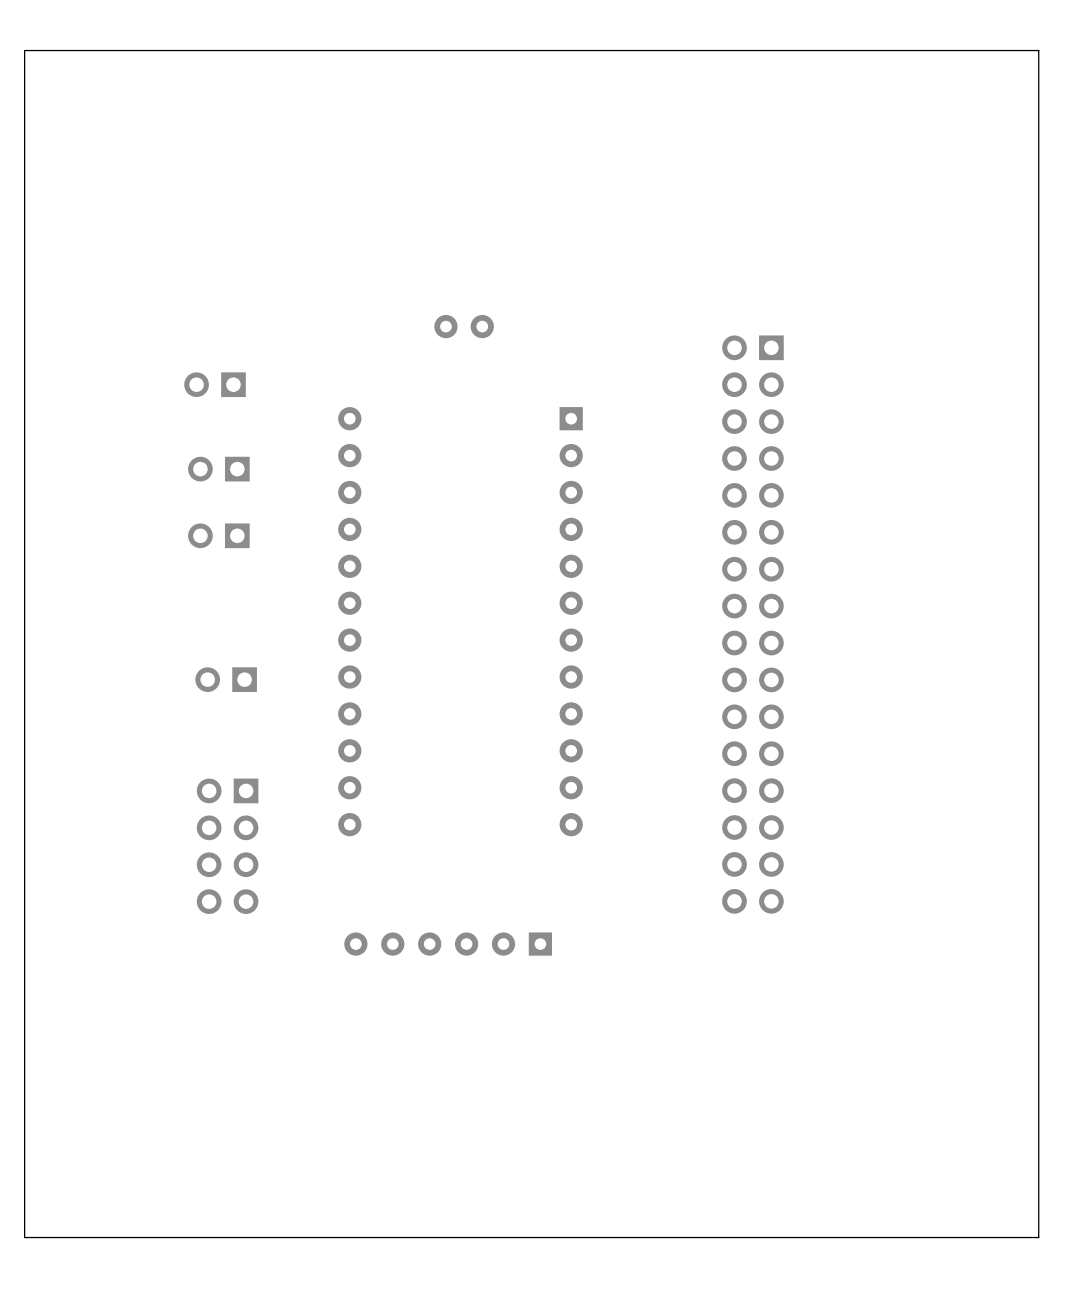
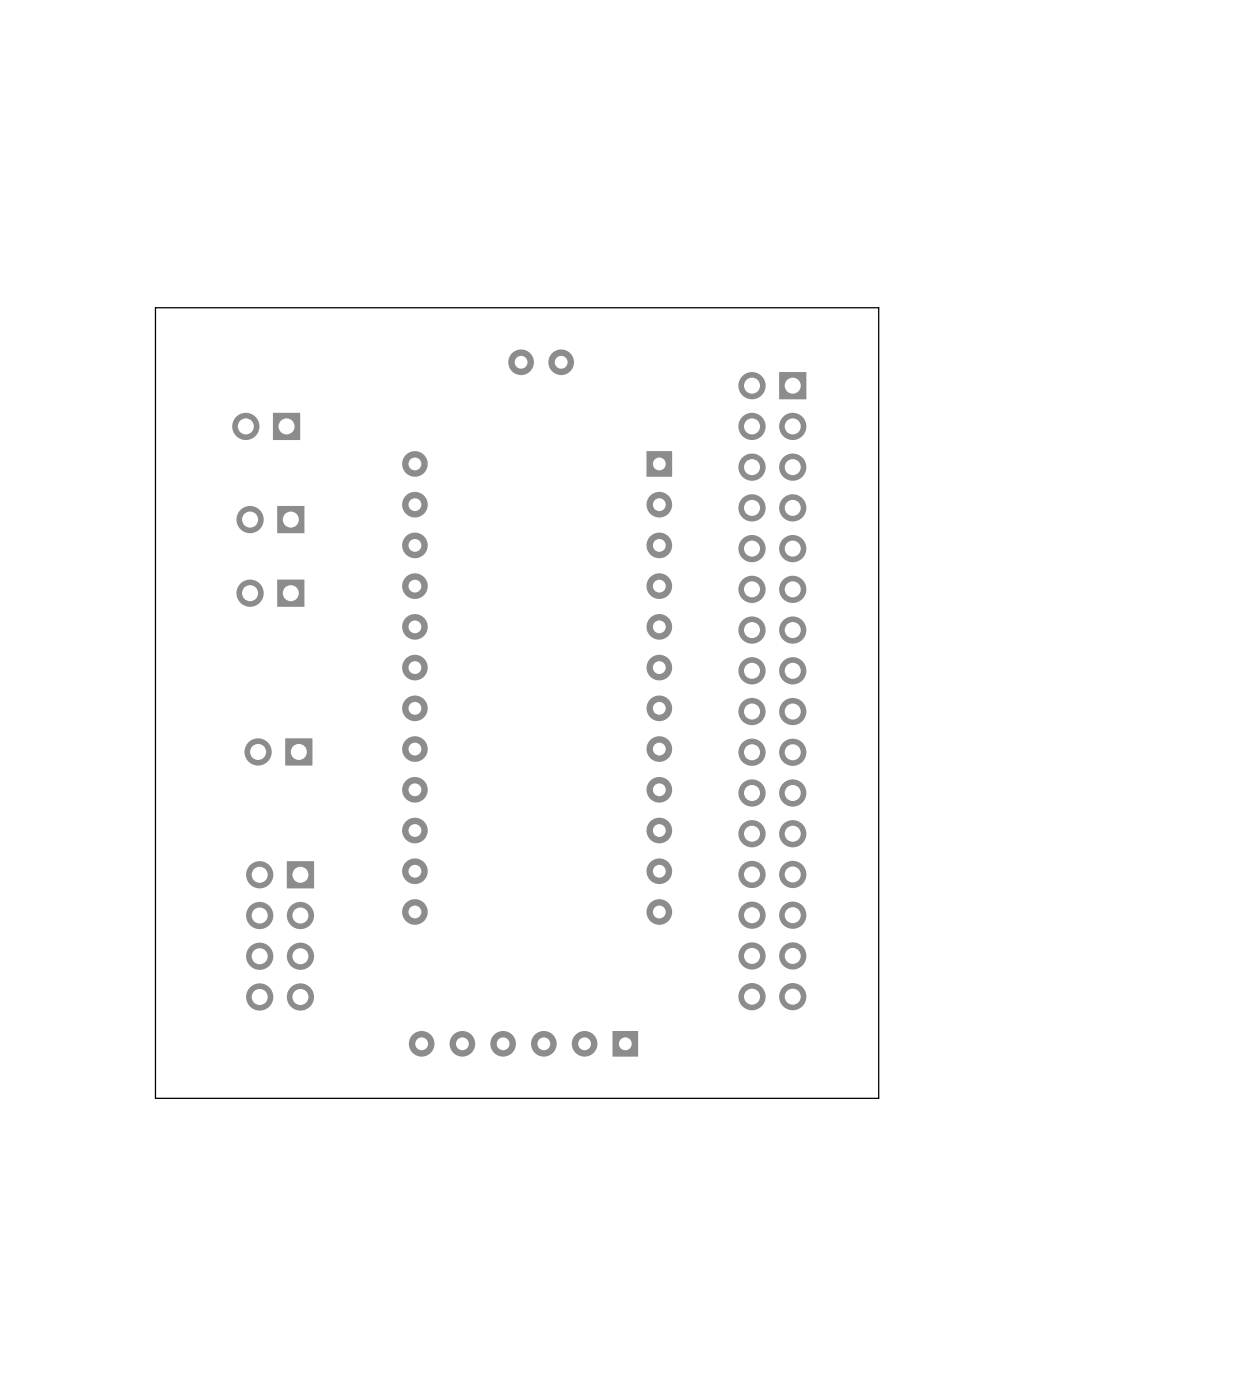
board edge: (1038, 50) (24, 50) (24, 1237) (1038, 1237) (1038, 50) -> none
board edge: none -> (878, 307) (155, 307) (155, 1098) (878, 1098) (878, 307)
part position: (752, 624) -> (772, 691)

